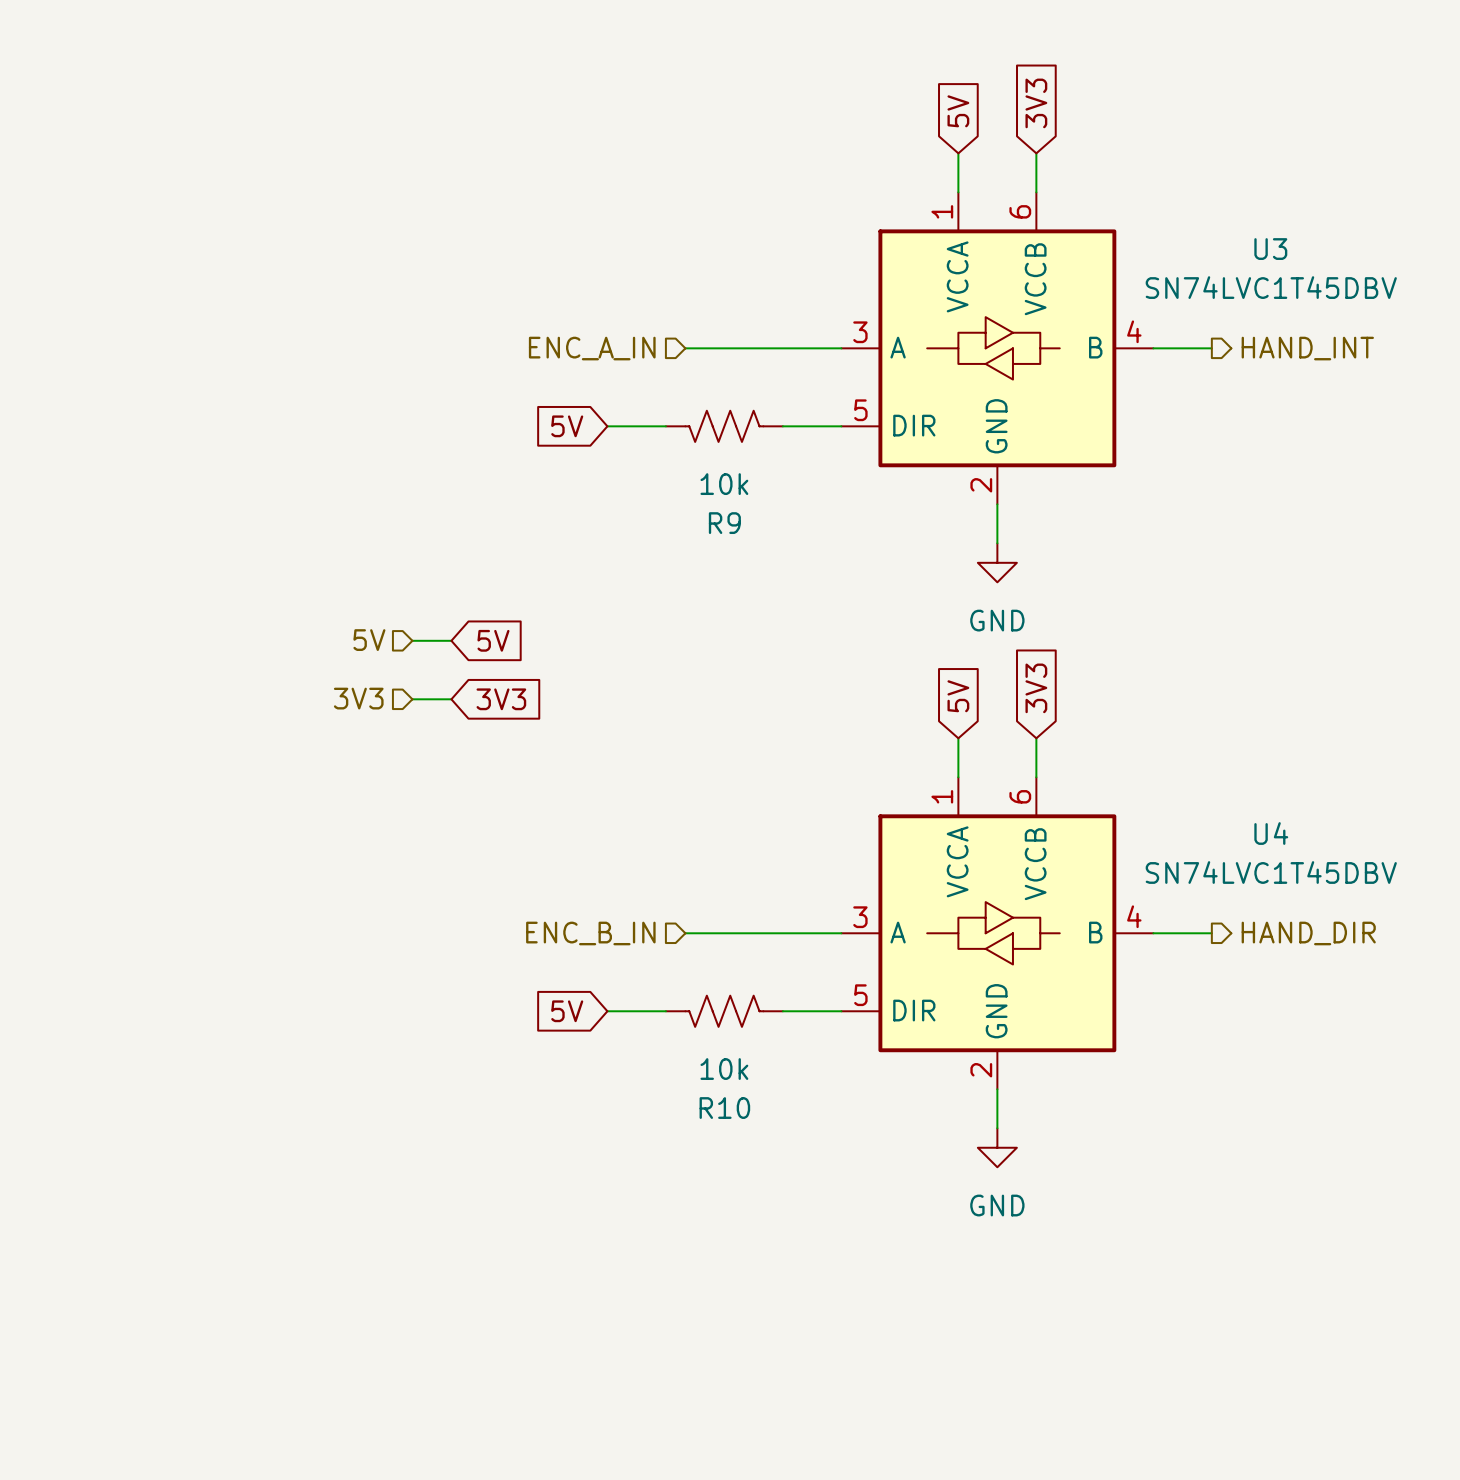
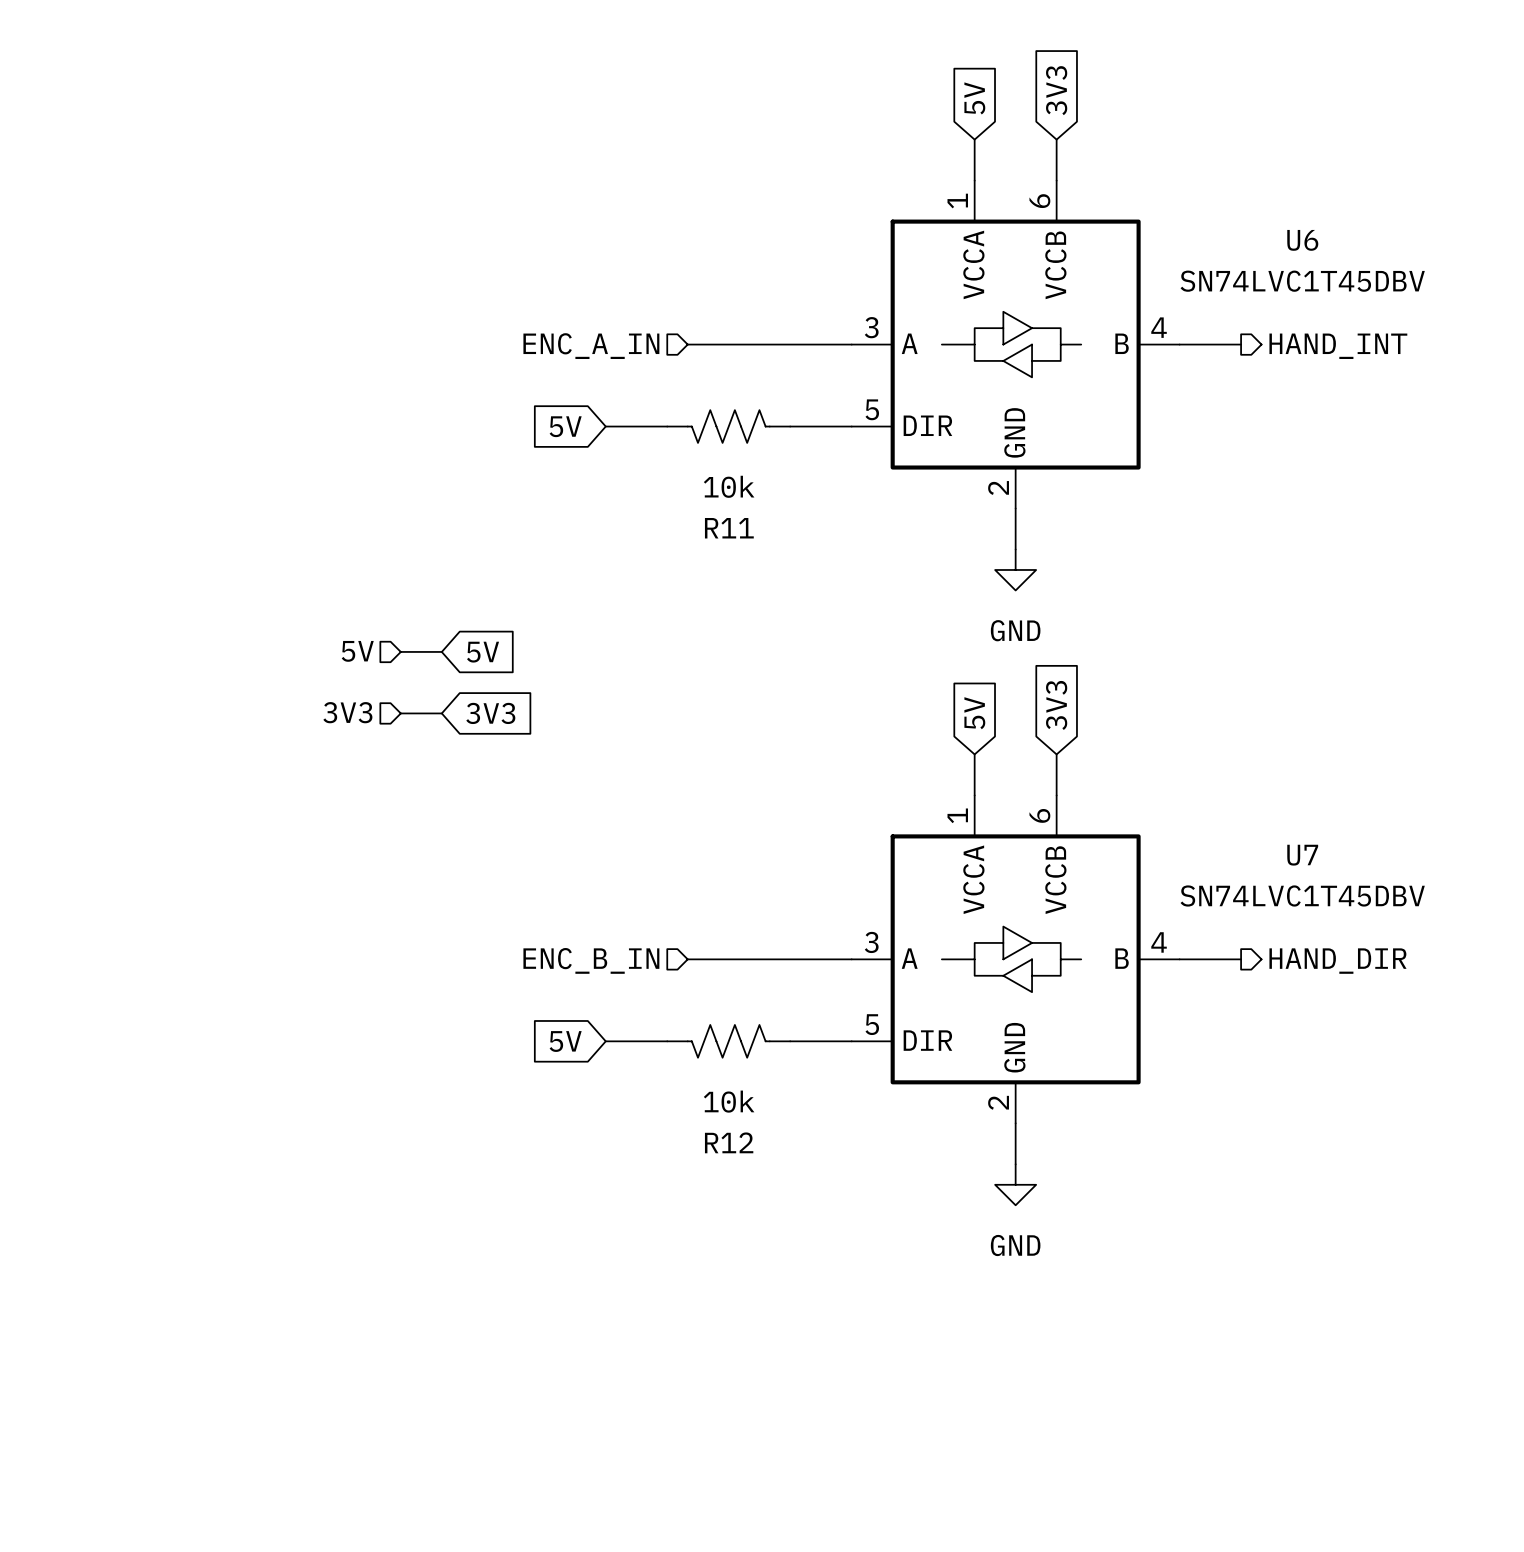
U3 name: U3 (1270, 249) -> U6 (1302, 240)
R9 name: R9 (724, 523) -> R11 (729, 528)
U4 name: U4 (1271, 833) -> U7 (1302, 855)
R10 name: R10 (724, 1108) -> R12 (729, 1142)

